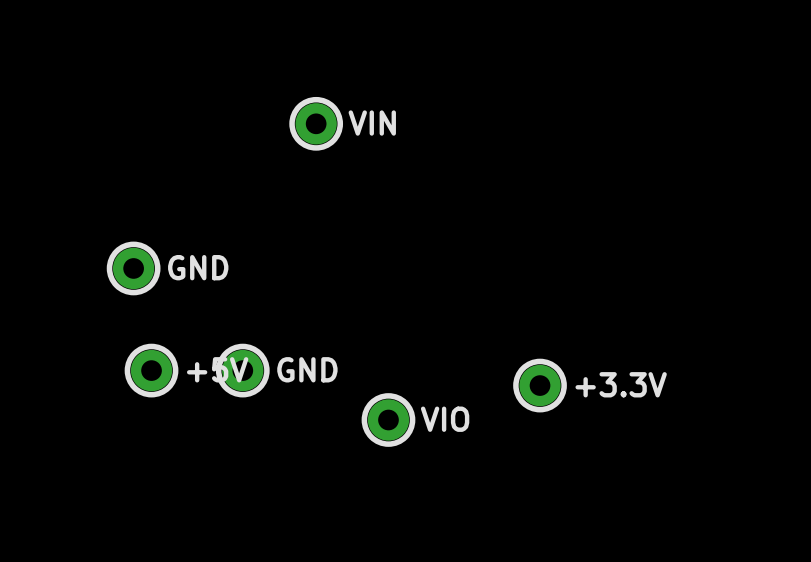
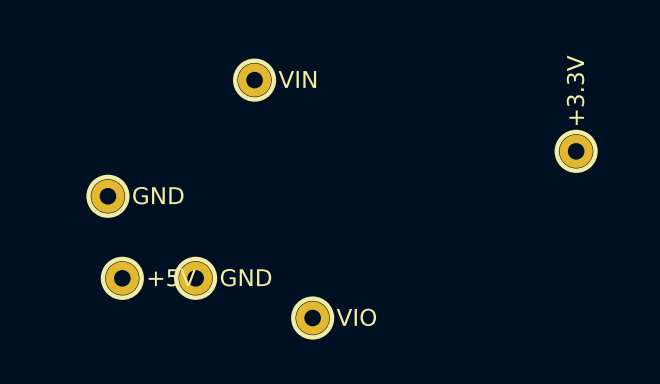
part value rotation: 0° (621, 384) -> 90° counterclockwise (575, 90)
part value position: +3.3V (621, 384) -> +3.3V (575, 90)
part position: (540, 385) -> (576, 151)

